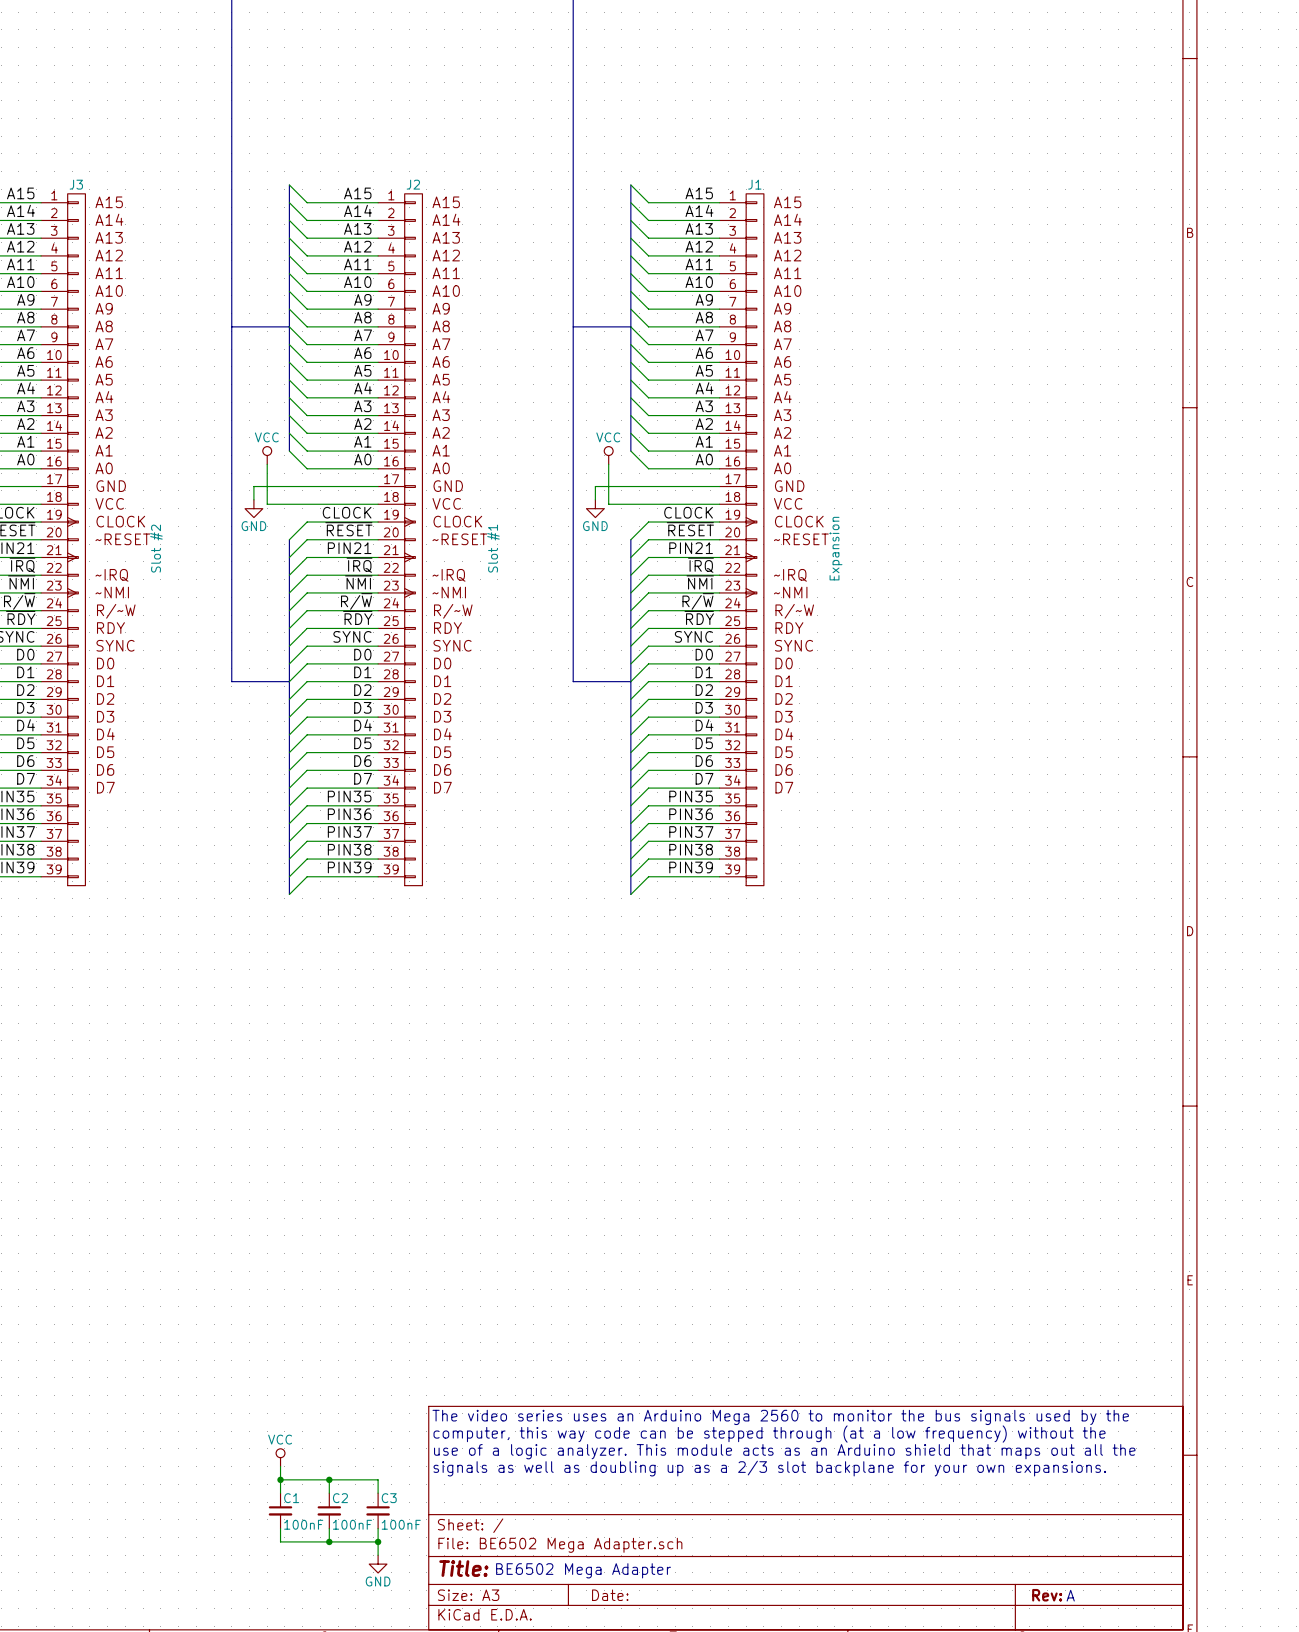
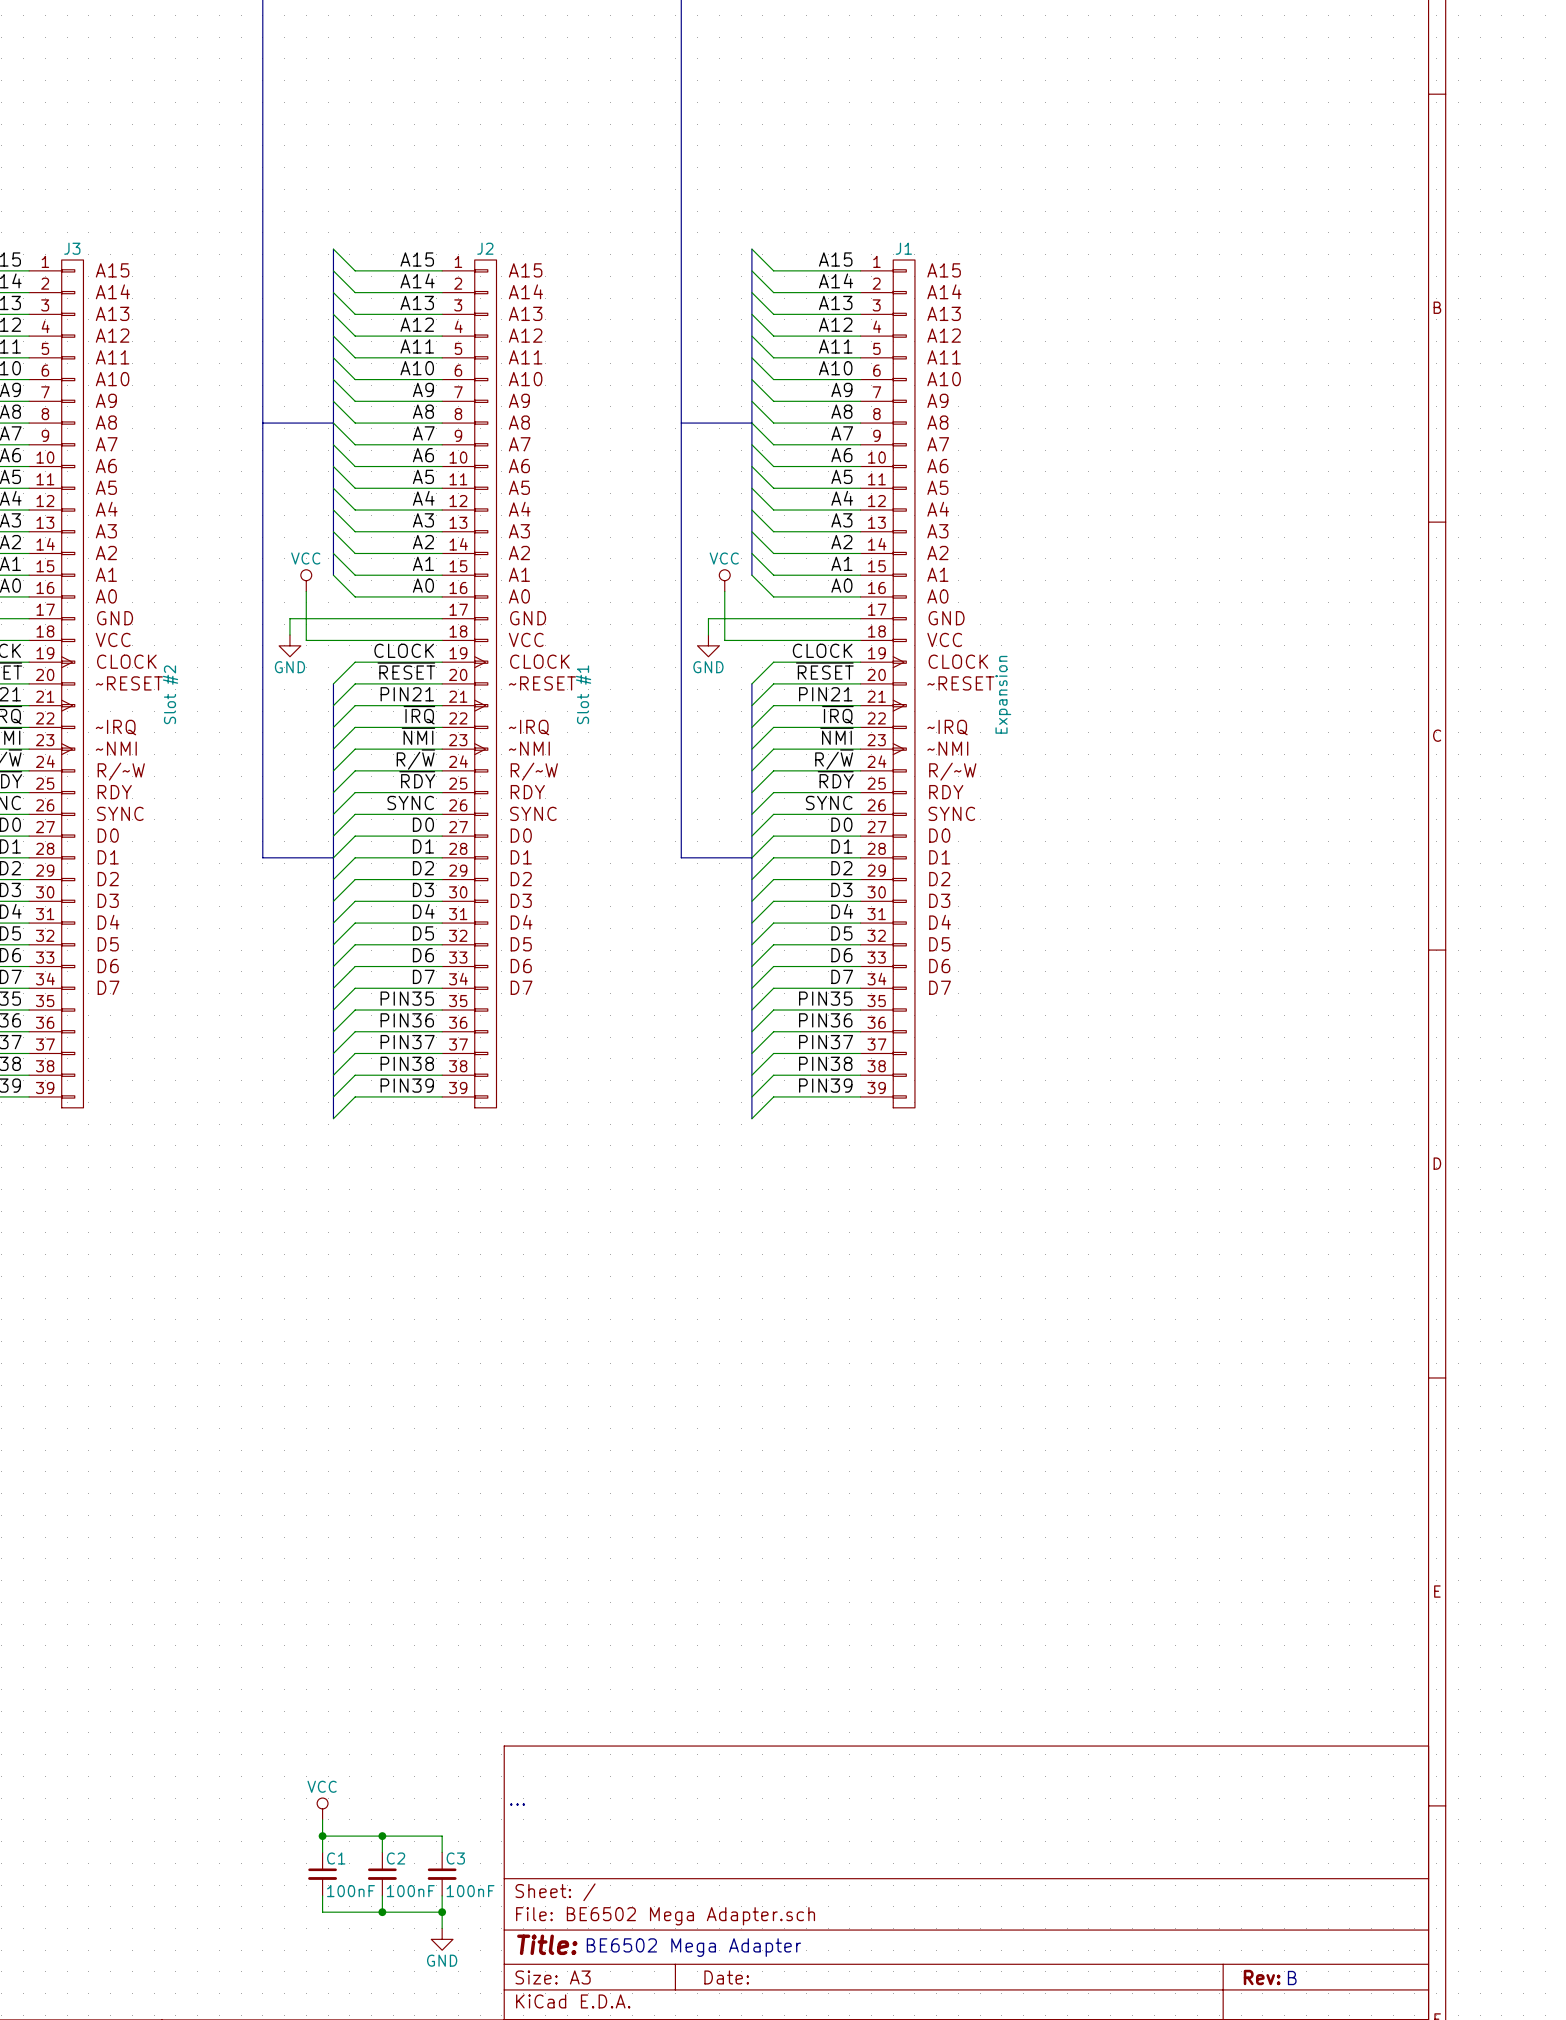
text: The video series uses an Arduino Mega 2560 to monitor the bus signals used by the (780, 1417) -> none
text: computer, this way code can be stepped through (at a low frequency) without the (769, 1434) -> none
text: use of a logic analyzer. This module acts as an Arduino shield that maps out all the (784, 1451) -> ... (517, 1804)
text: signals as well as doubling up as a 2/3 slot backplane for your own expansions. (769, 1468) -> none
text: A (1070, 1595) -> B (1292, 1978)

